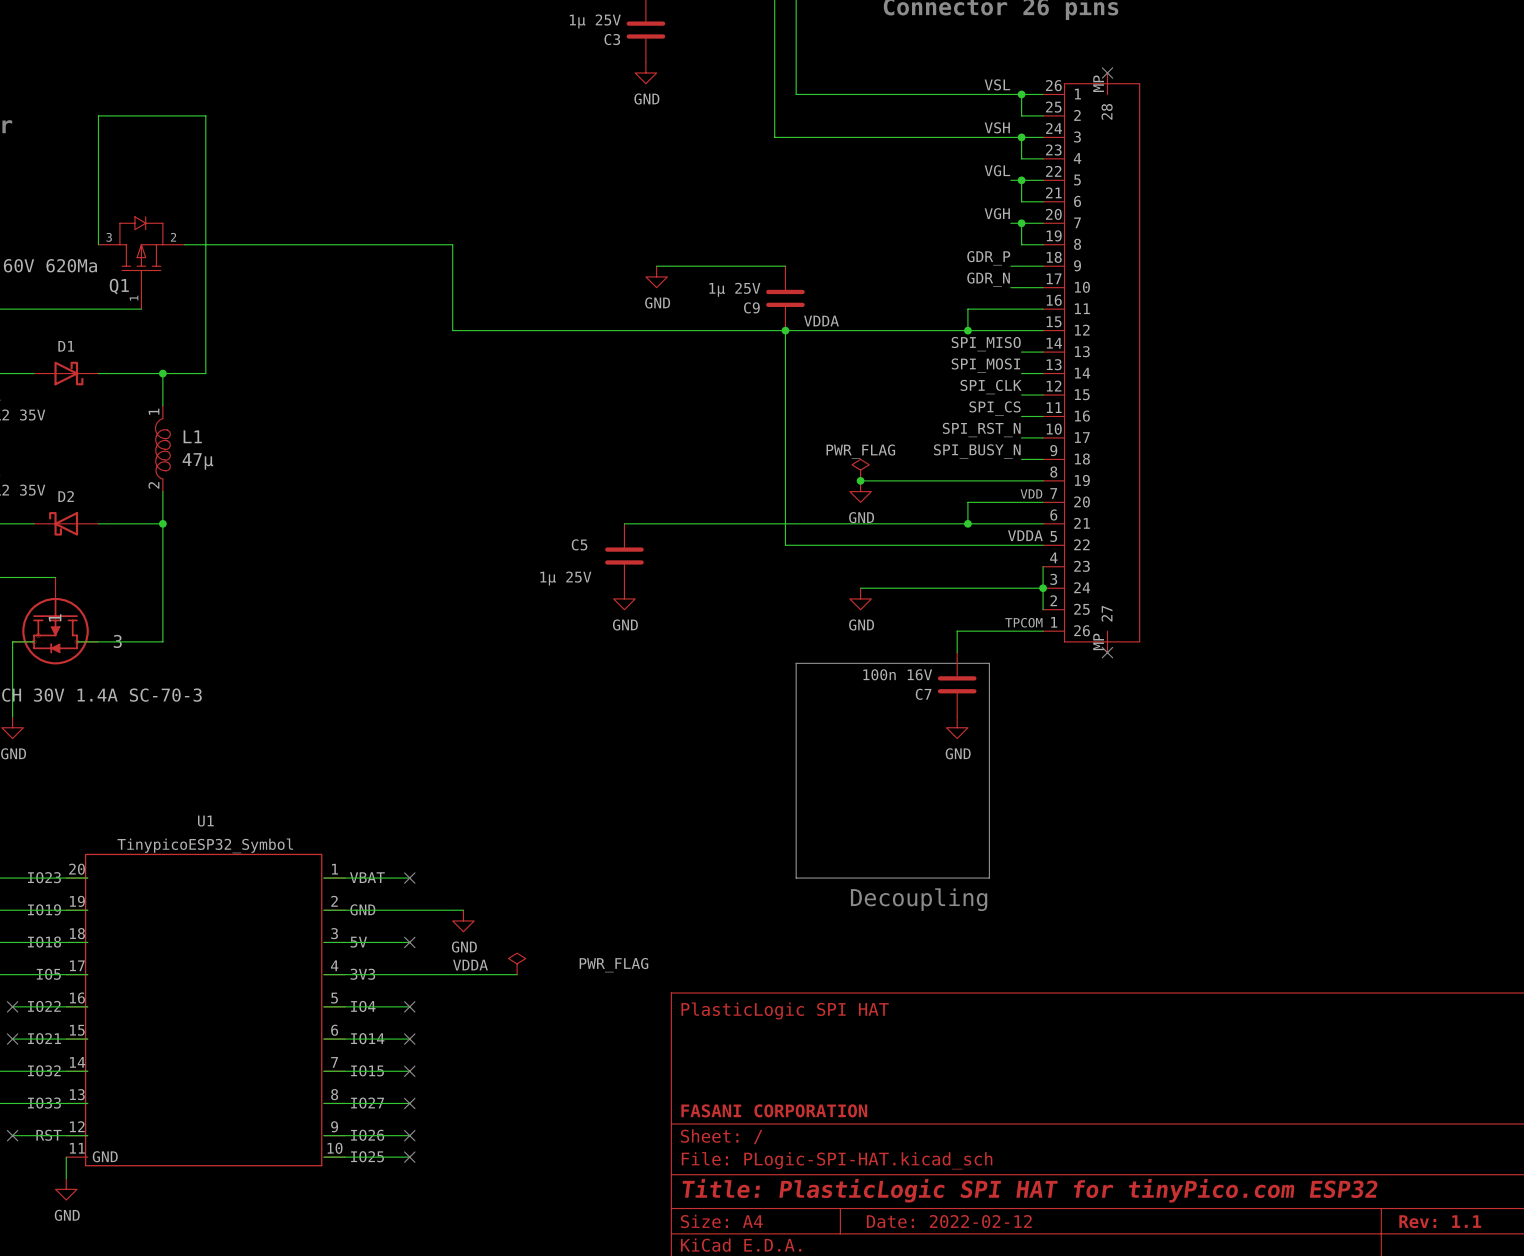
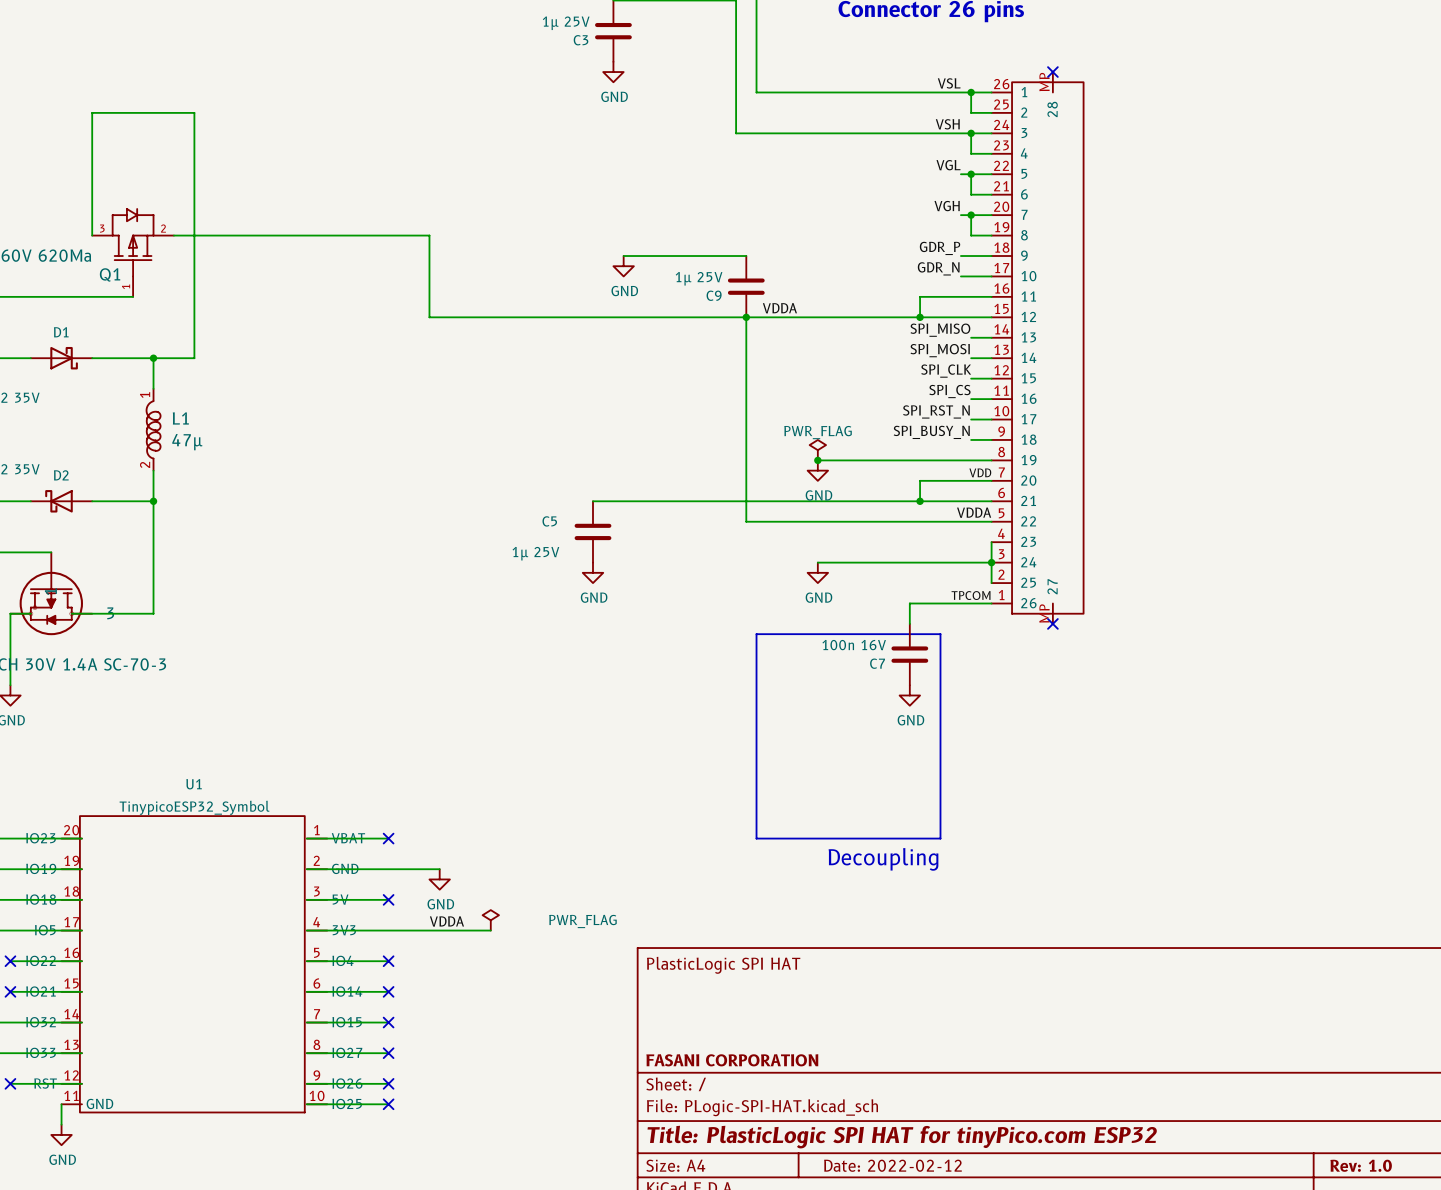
title block: Rev: 1.1 (1440, 1221) -> Rev: 1.0 (1361, 1165)

